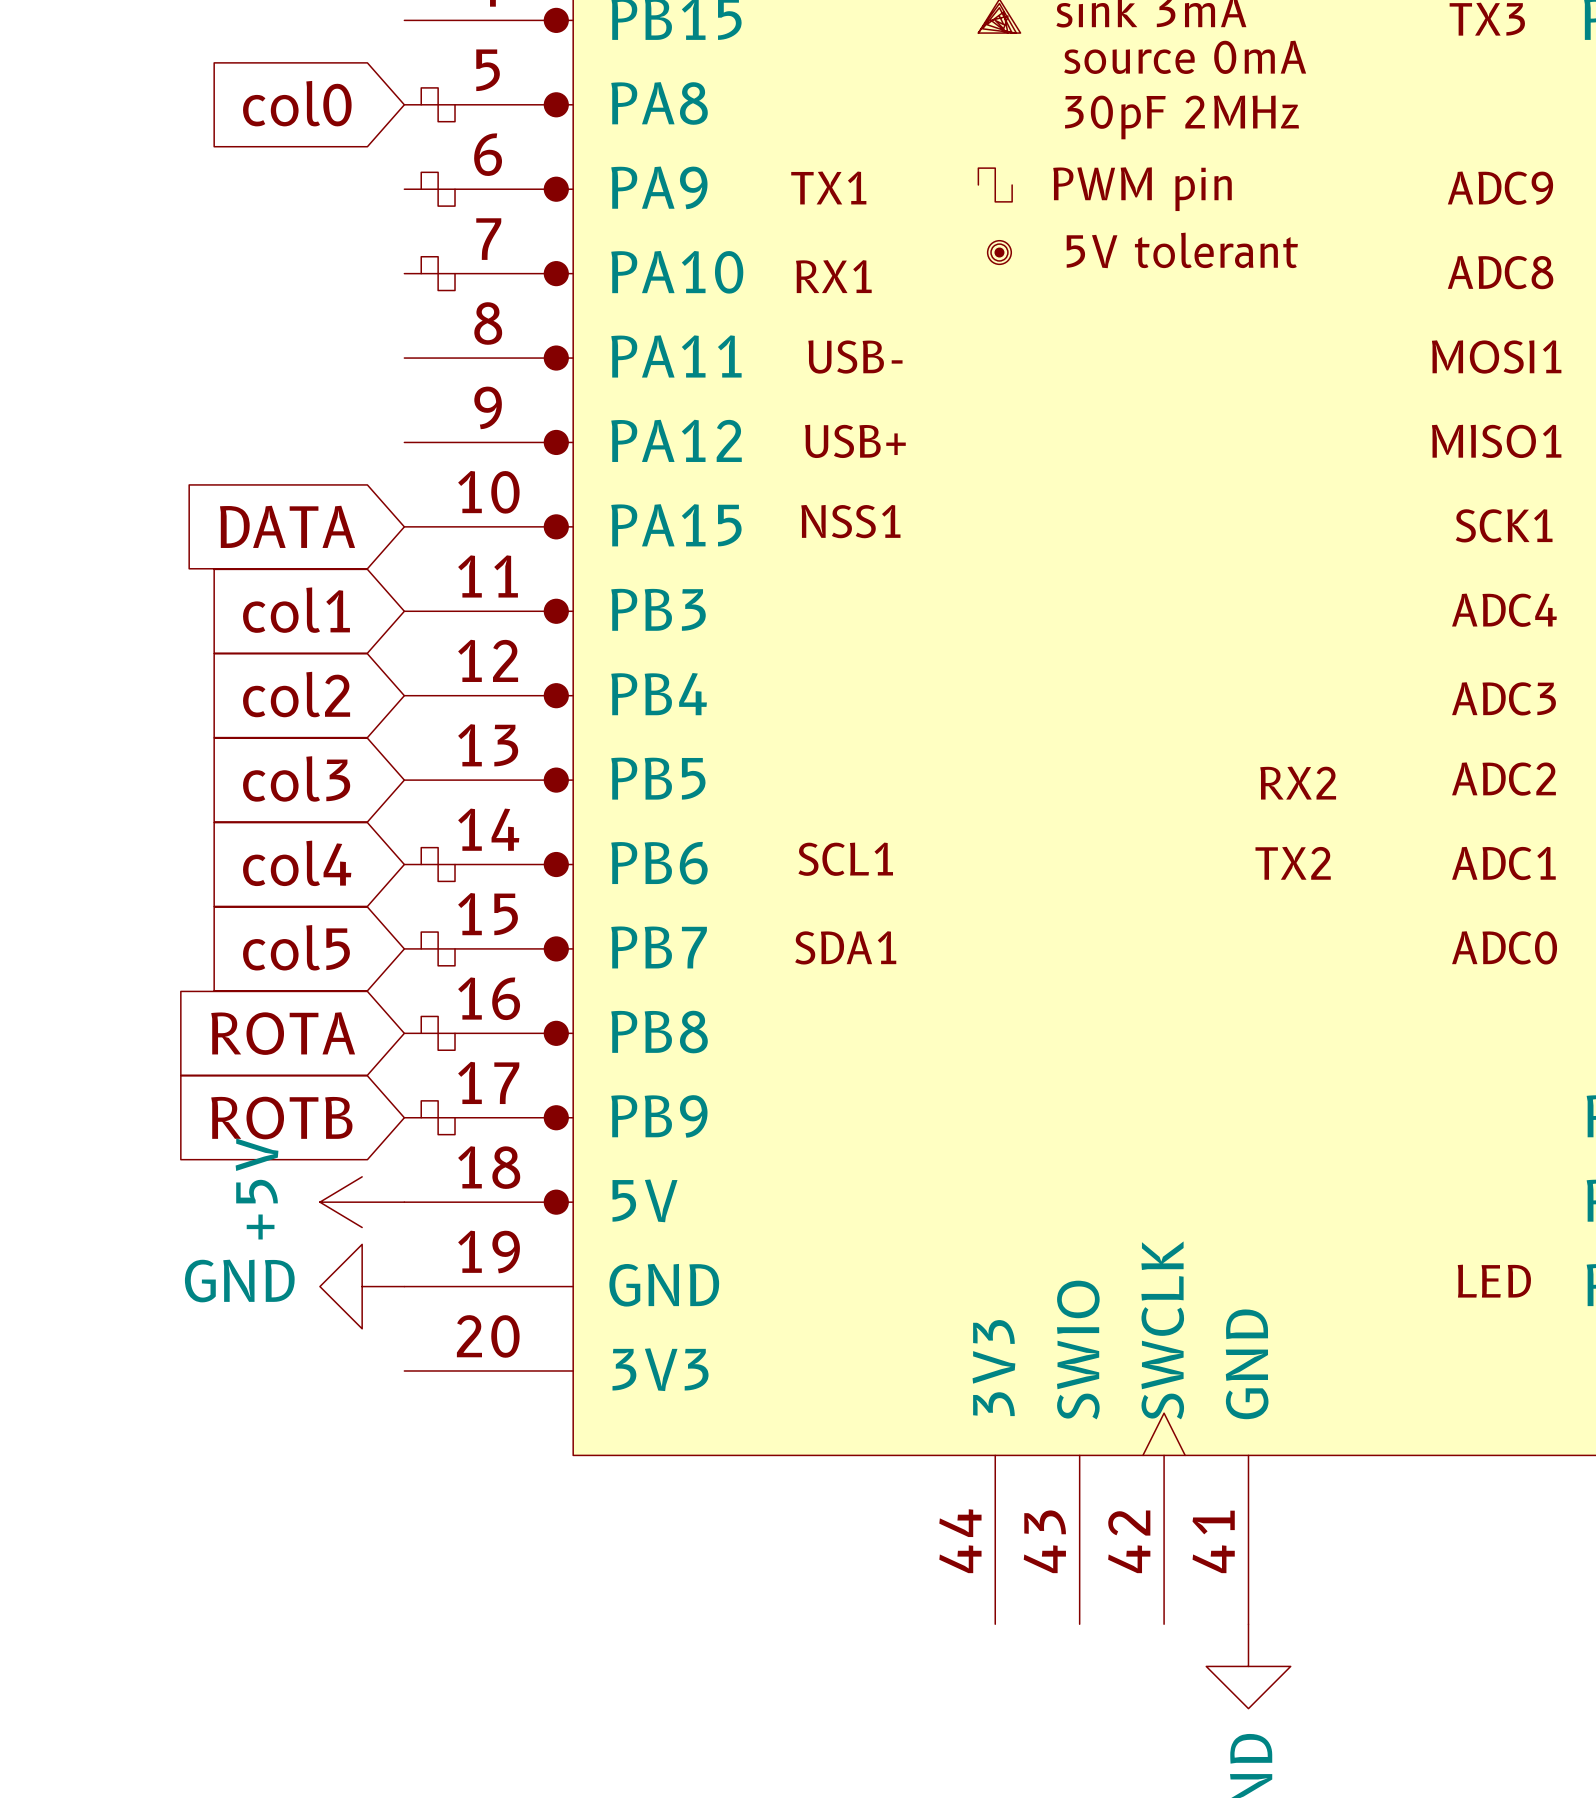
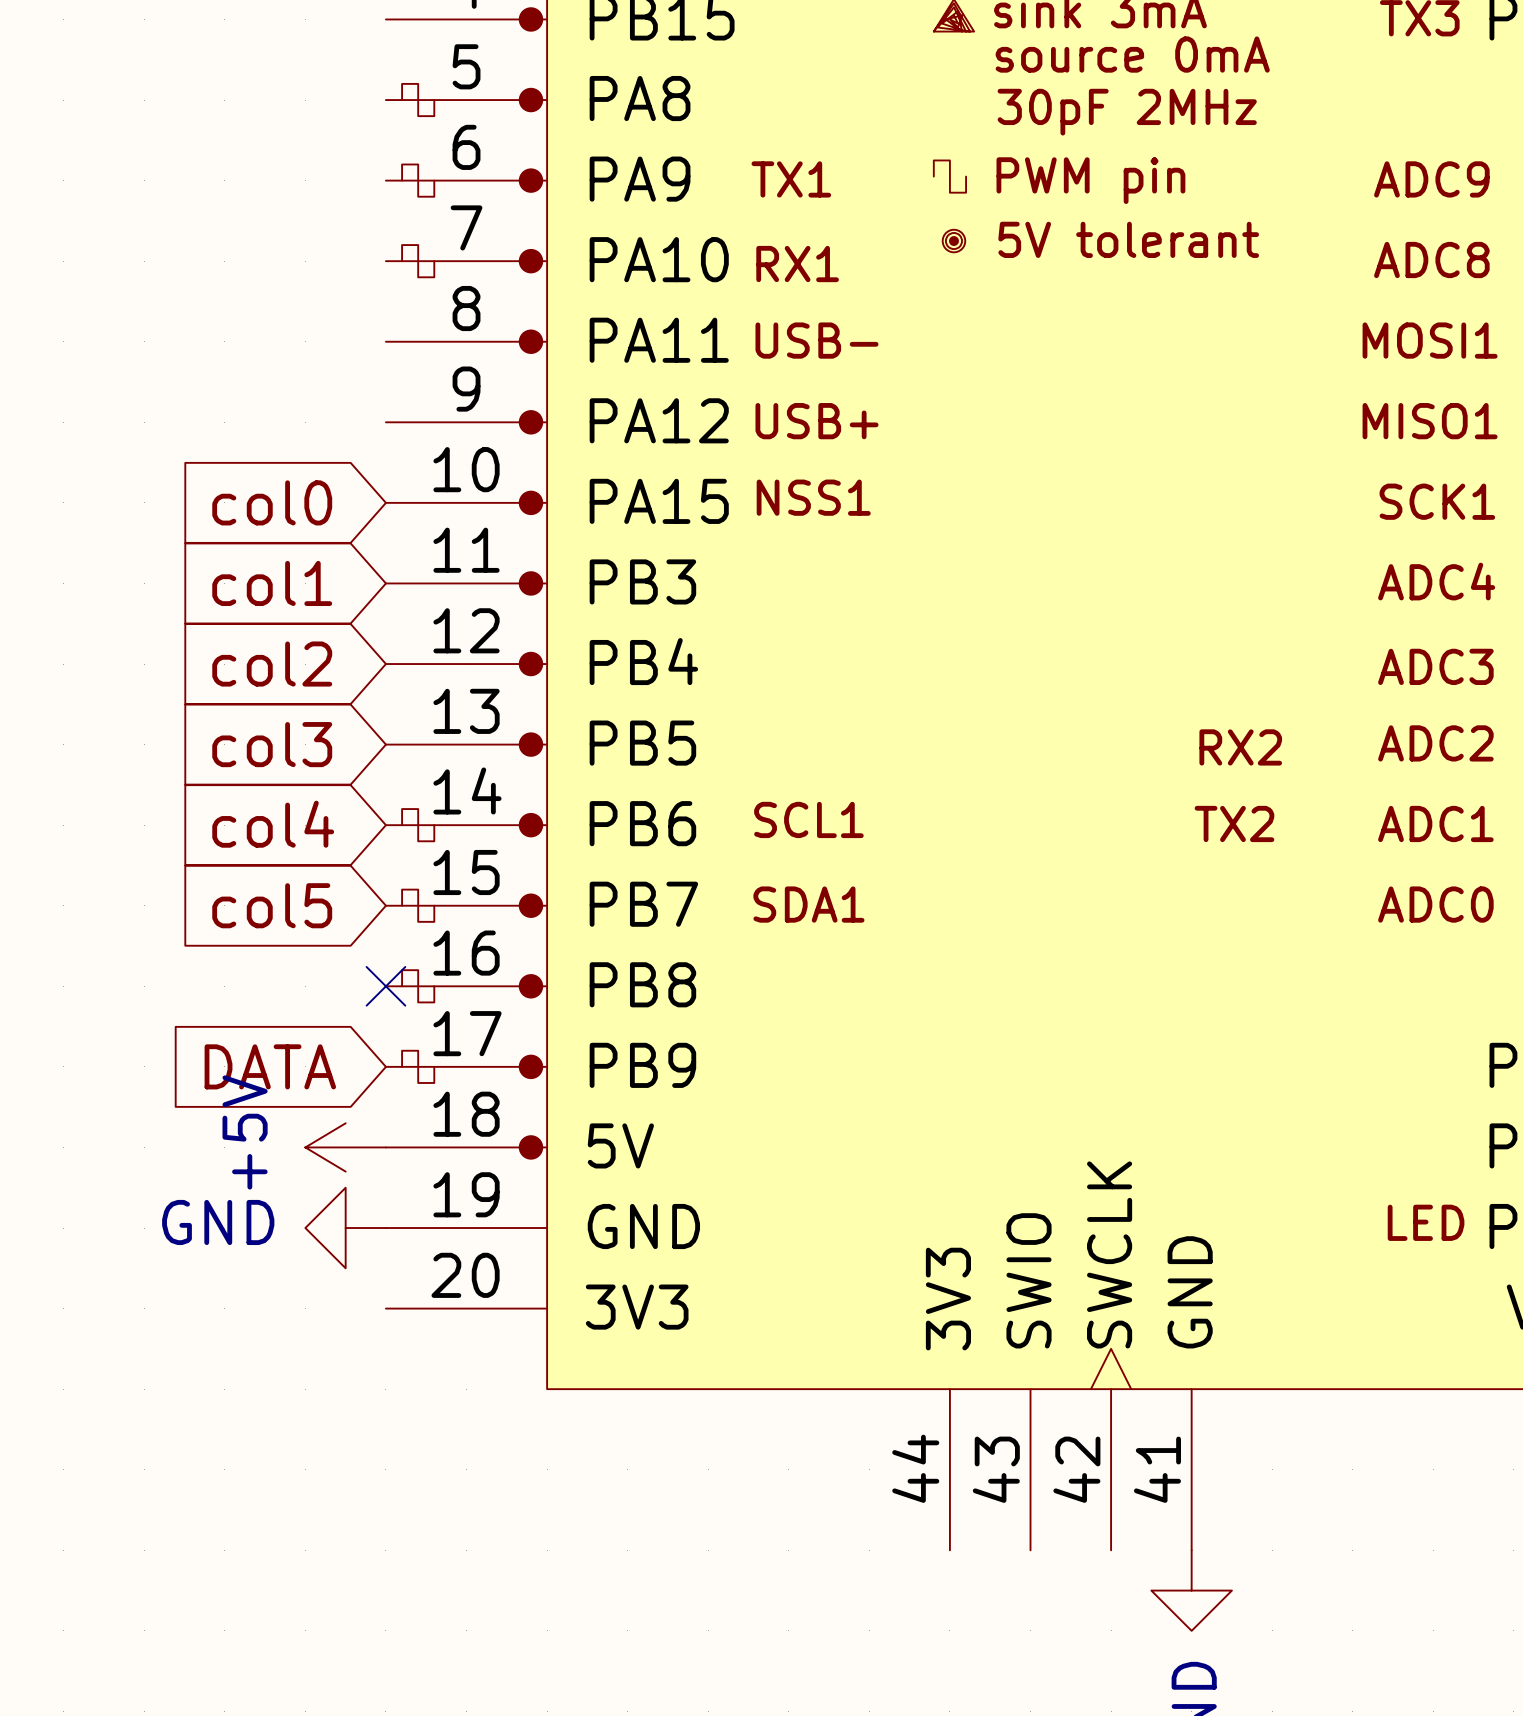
global label: col0 (297, 103) -> none
global label: DATA (287, 526) -> col0 (272, 502)
global label: ROTA (283, 1033) -> none
no-connect mark: none -> (385, 986)
global label: ROTB (281, 1118) -> DATA (270, 1066)

